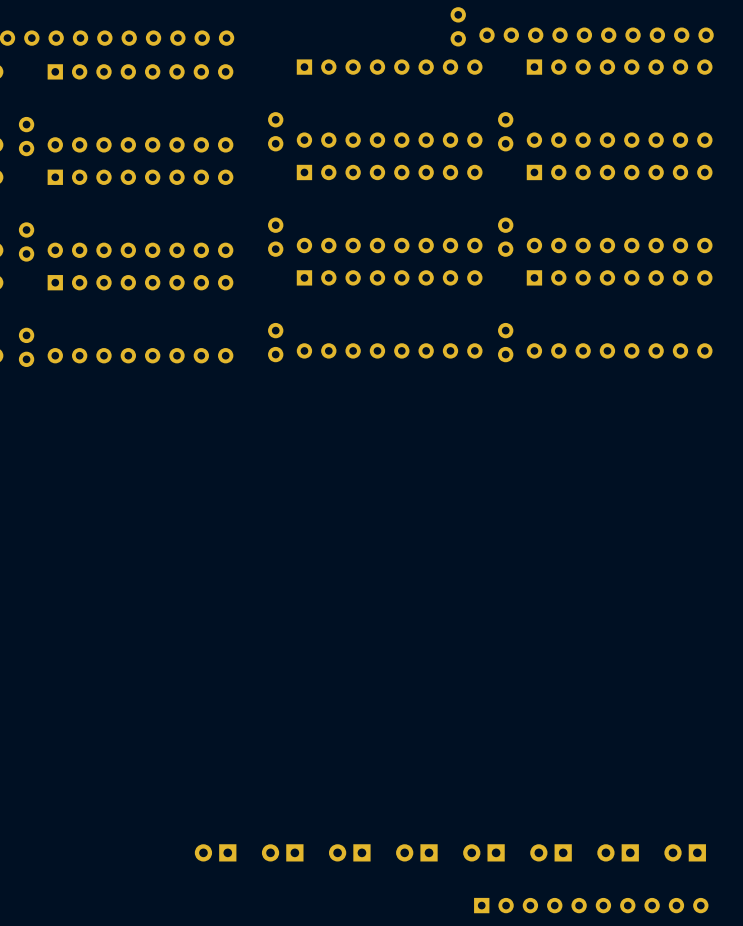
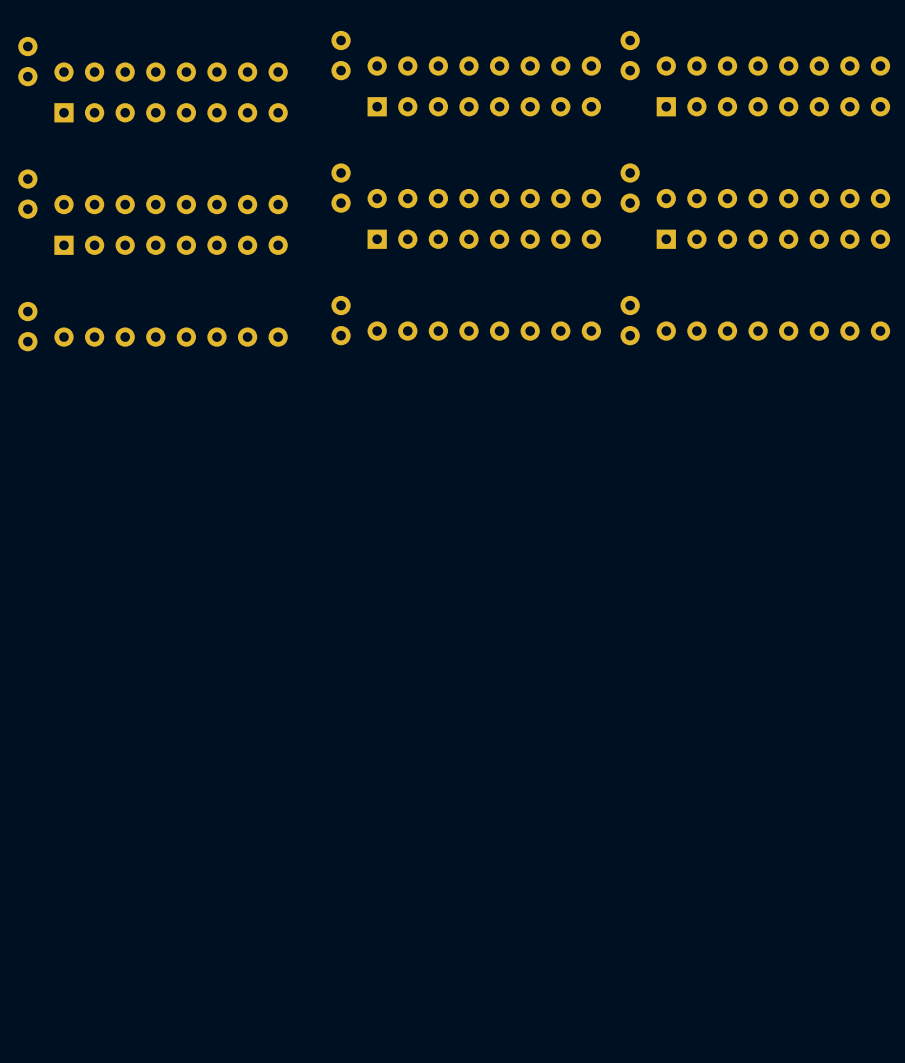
part: (215, 852) -> none
part: (282, 852) -> none
part: (349, 852) -> none
part: (416, 852) -> none
part: (483, 852) -> none
part: (551, 852) -> none
part: (618, 852) -> none
part: (685, 852) -> none
part: (591, 905) -> none

